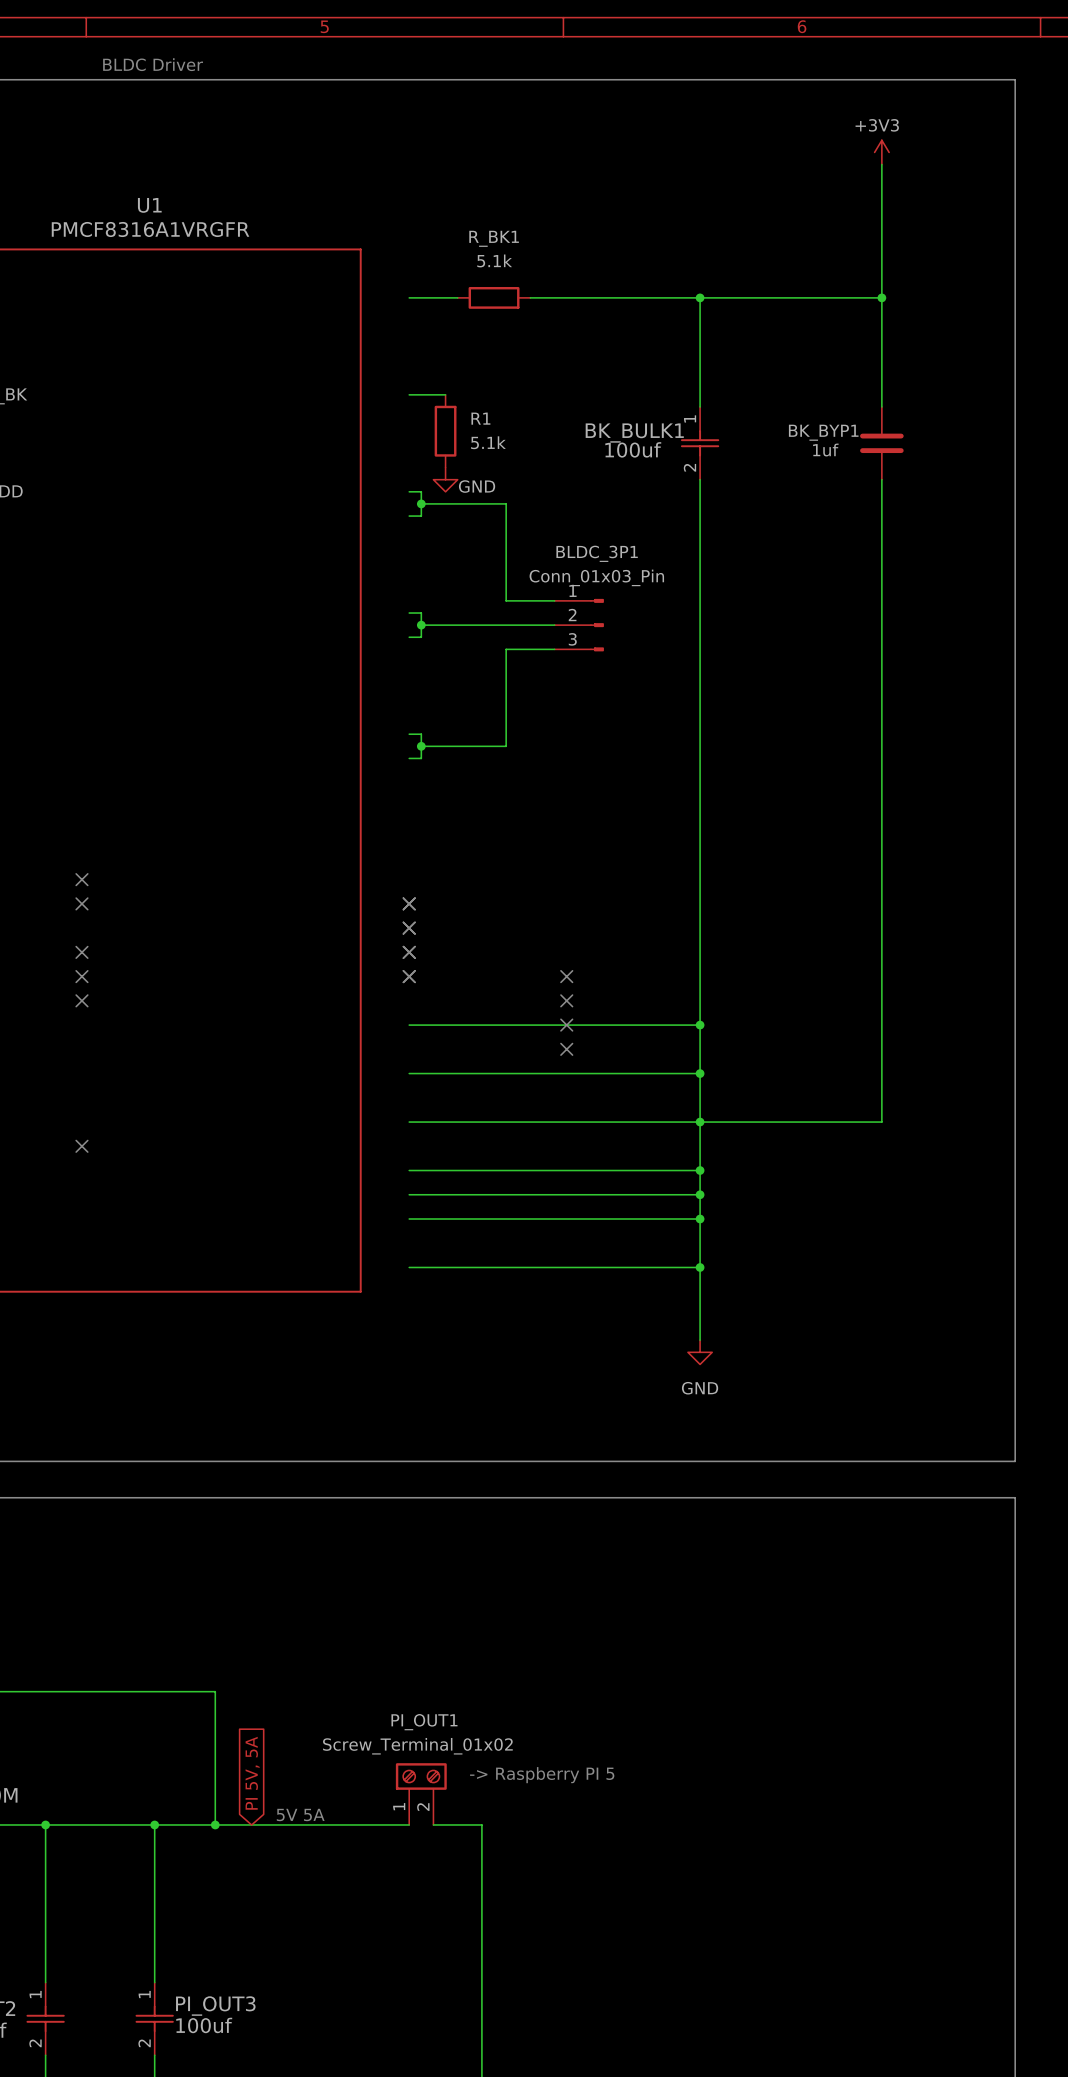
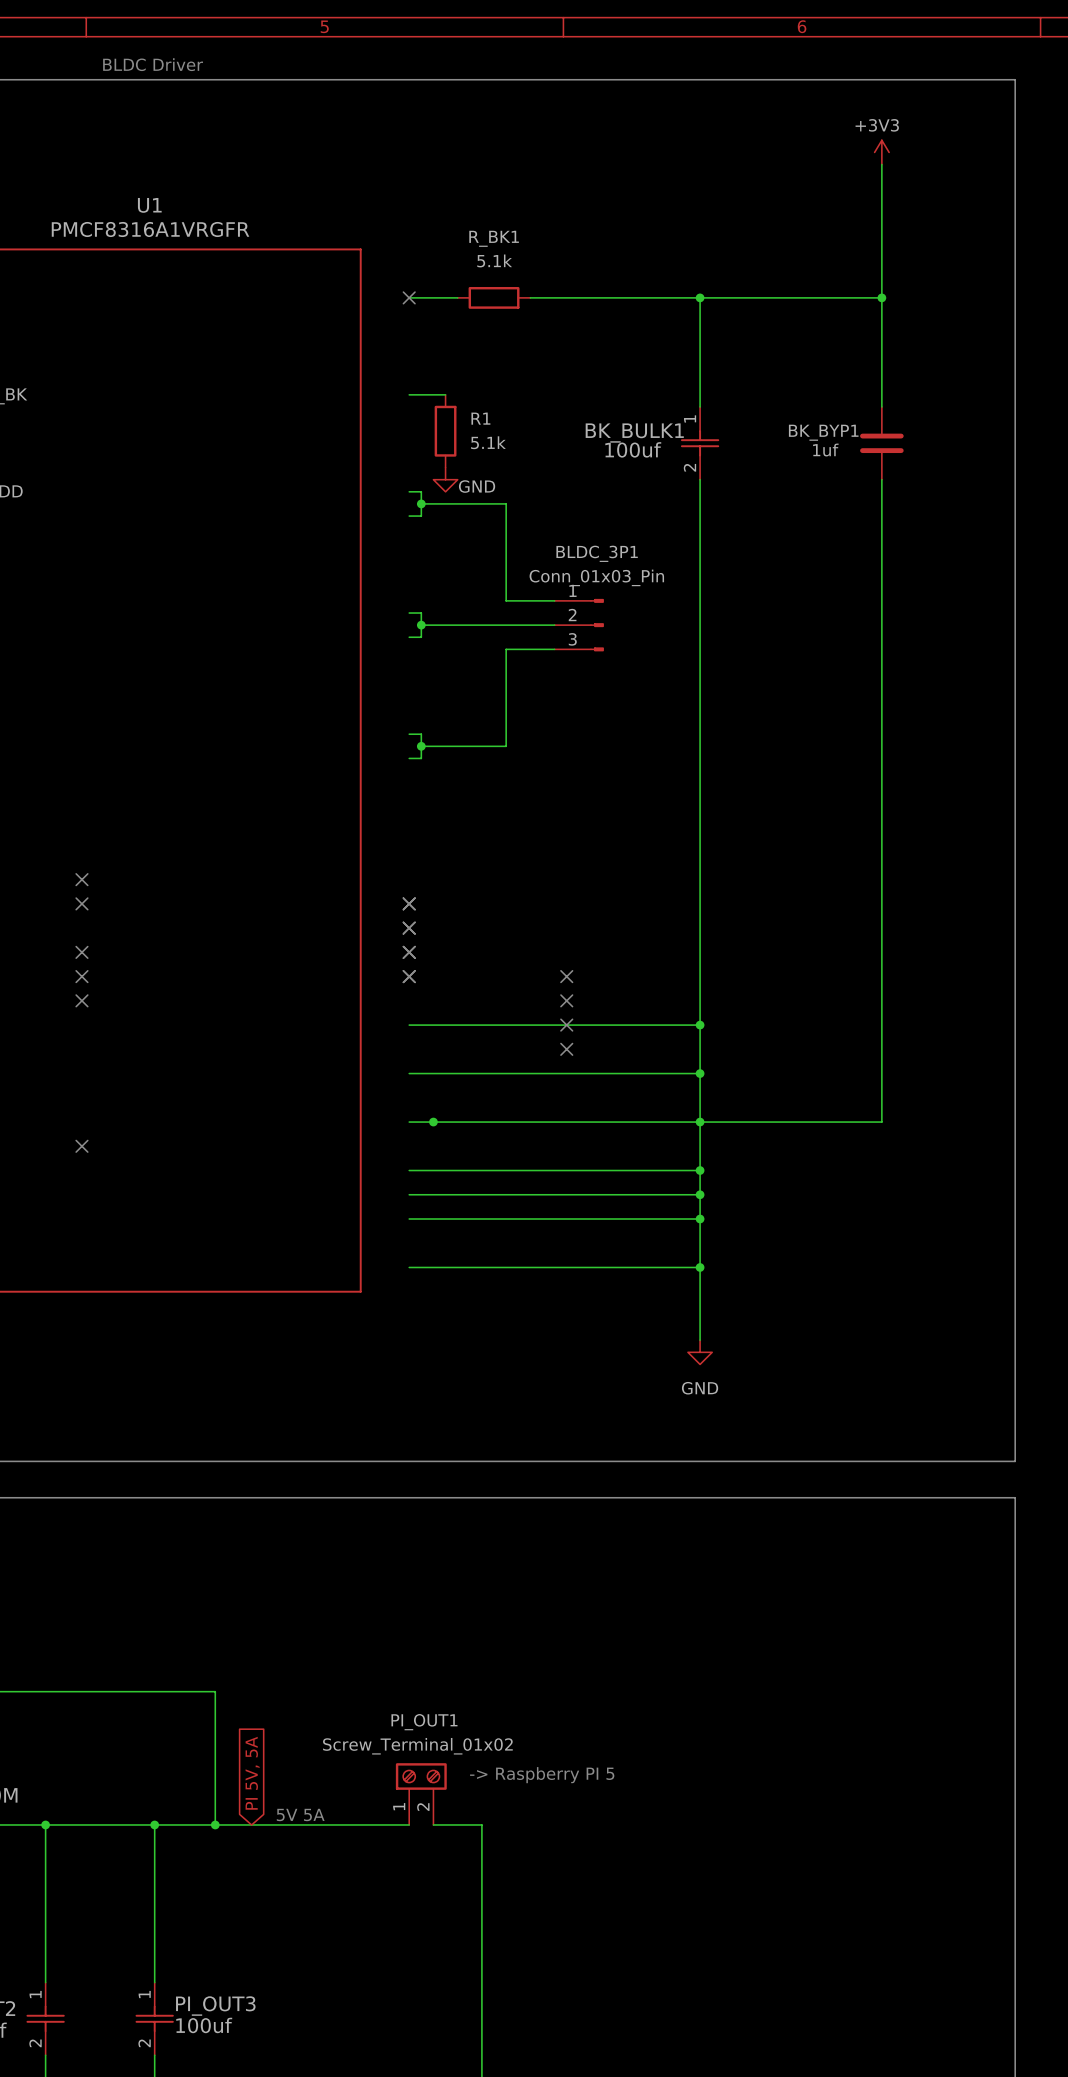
no-connect mark: none -> (409, 297)
junction: none -> (433, 1122)

